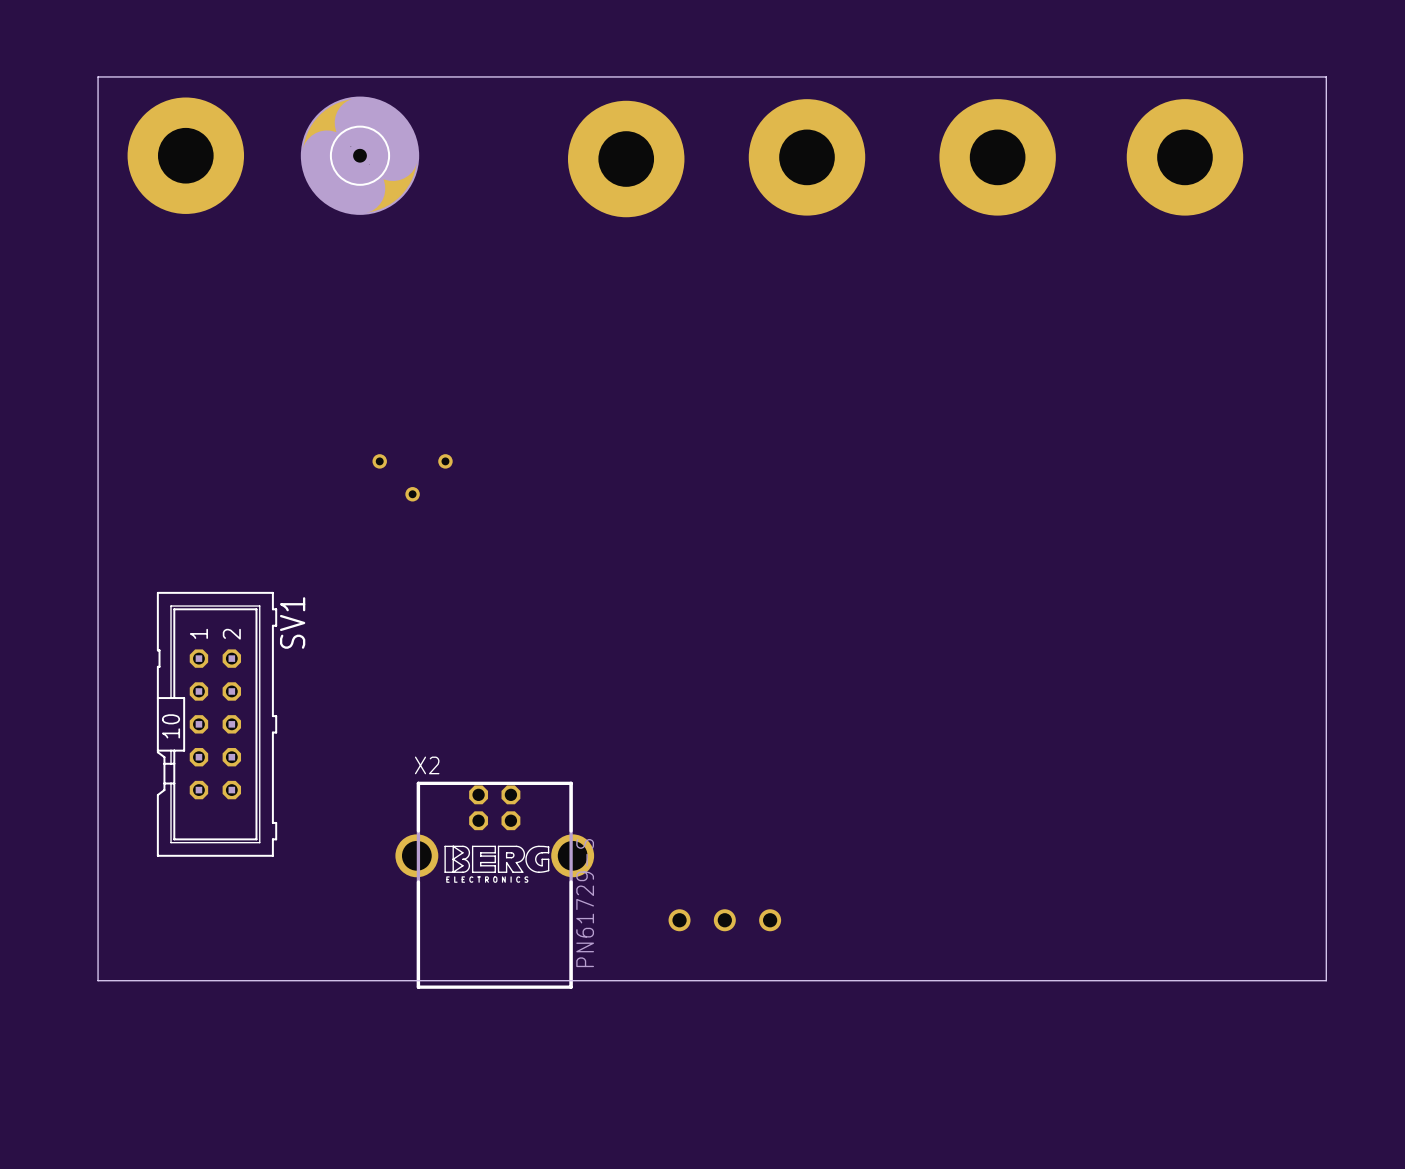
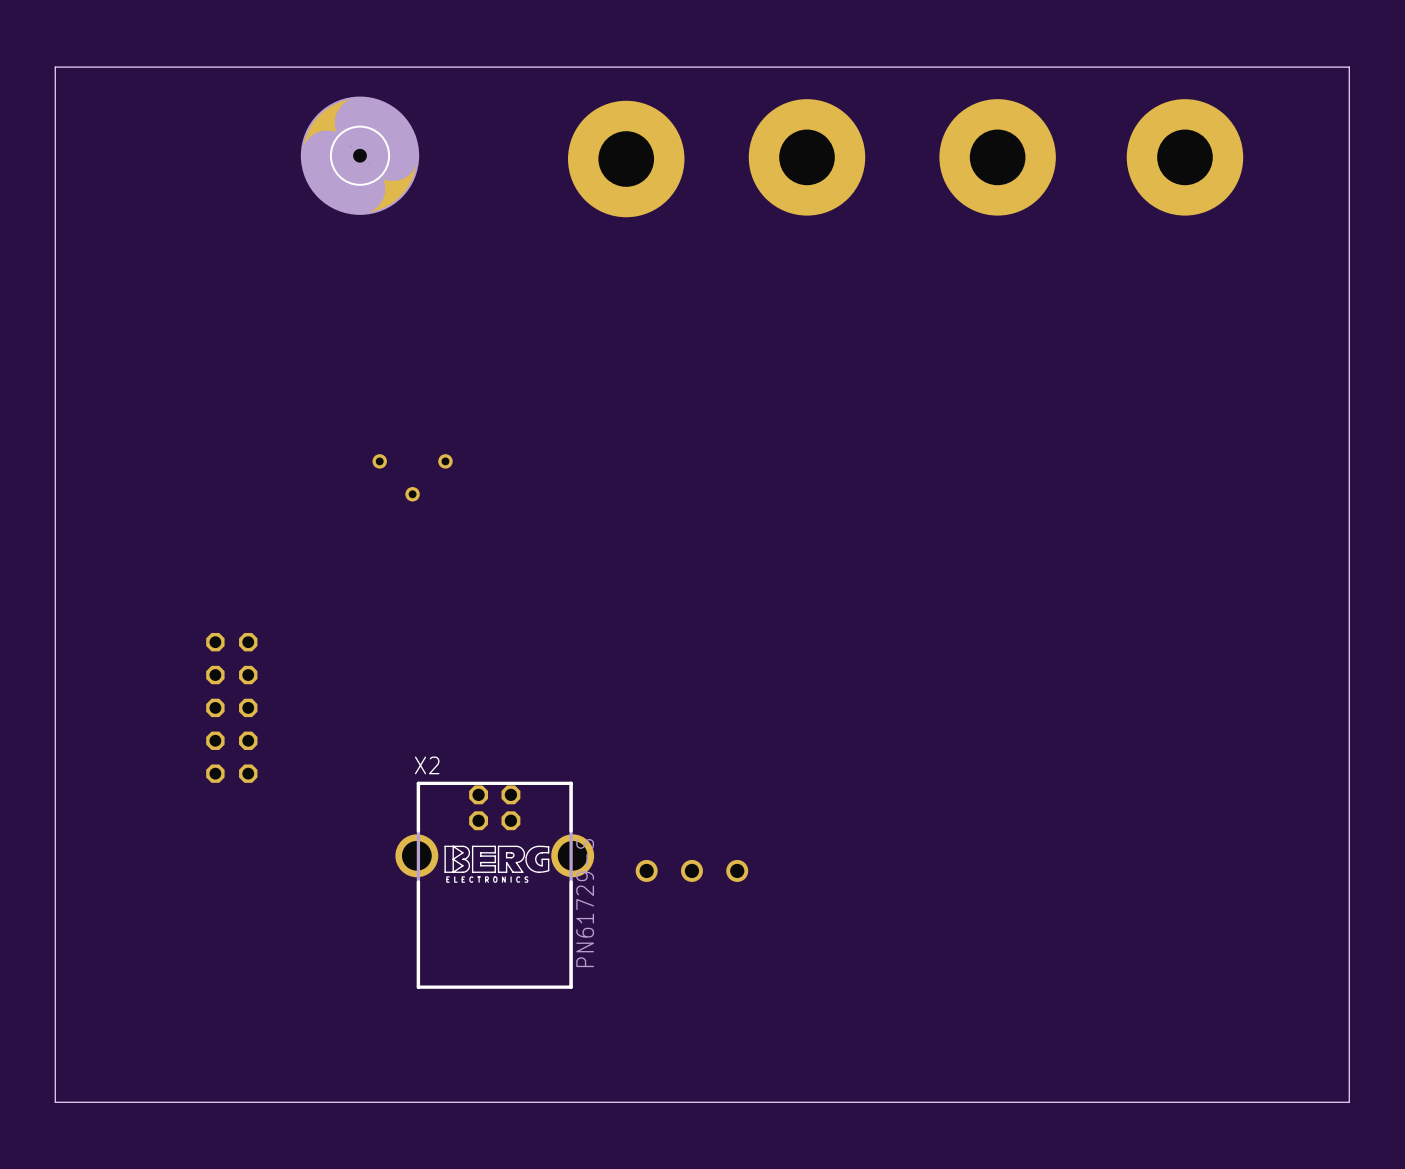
board edge: (1326, 76) (98, 76) (98, 980) (1326, 980) (1326, 76) -> (1349, 67) (1349, 1102) (55, 1102) (55, 67) (1349, 67)
part: (185, 155) -> none
SV1 side: bottom (217, 724) -> top (231, 707)
part position: (724, 920) -> (691, 870)

